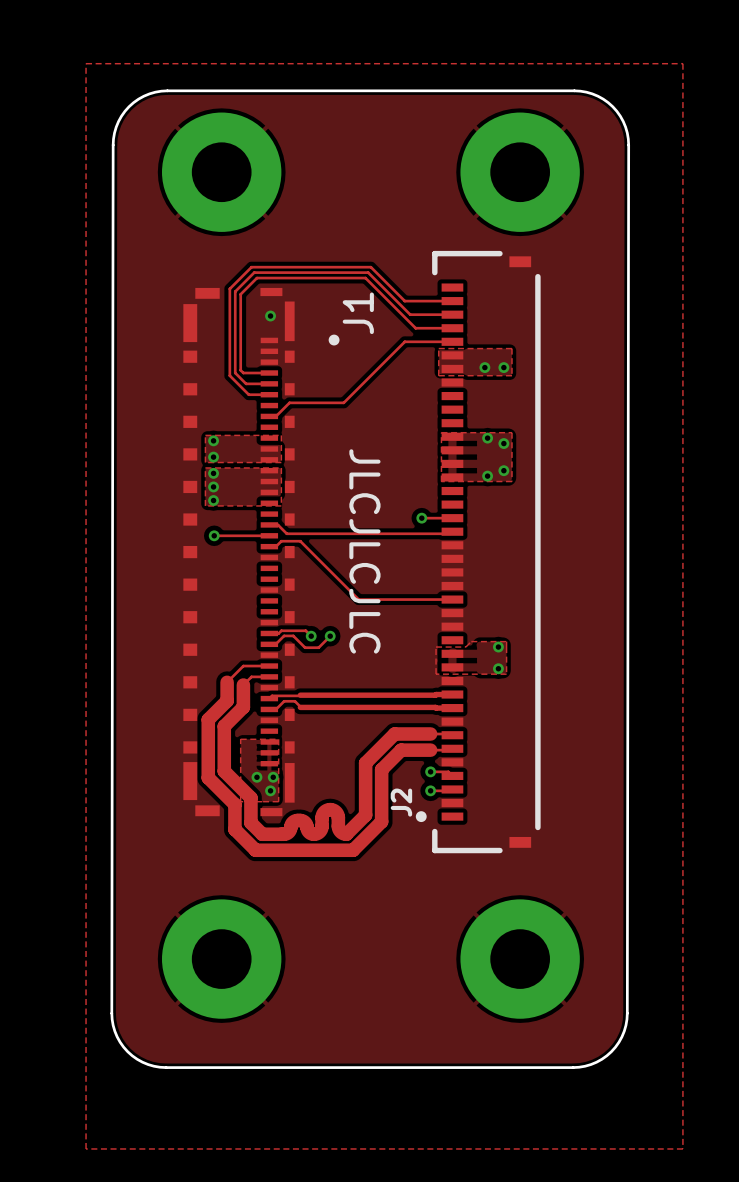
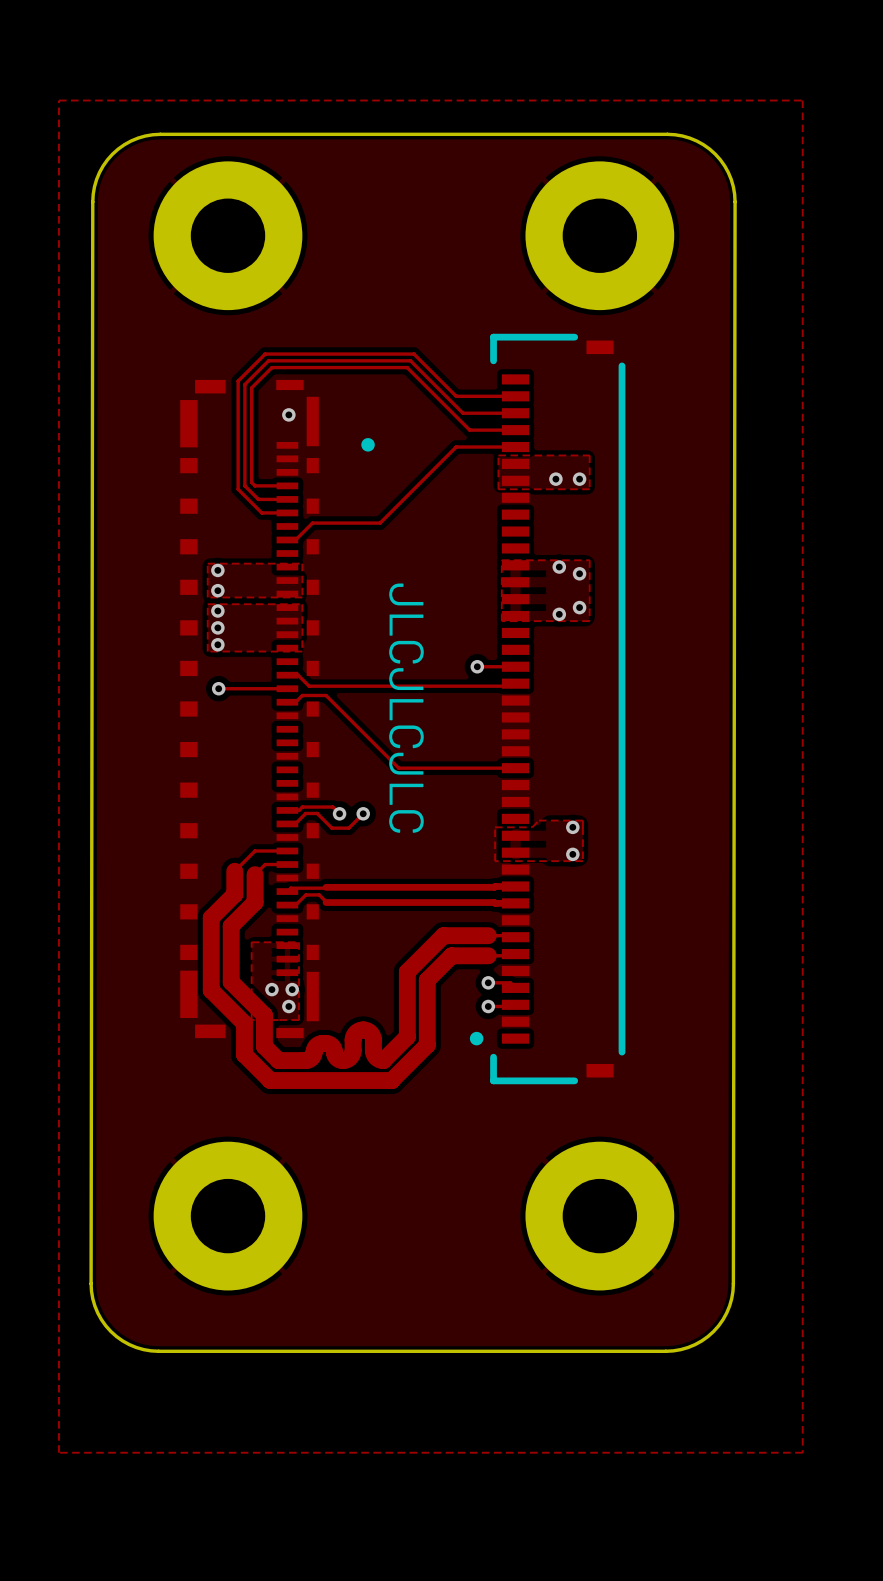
J1 name: J1 (358, 313) -> none
J2 name: J2 (401, 802) -> none

